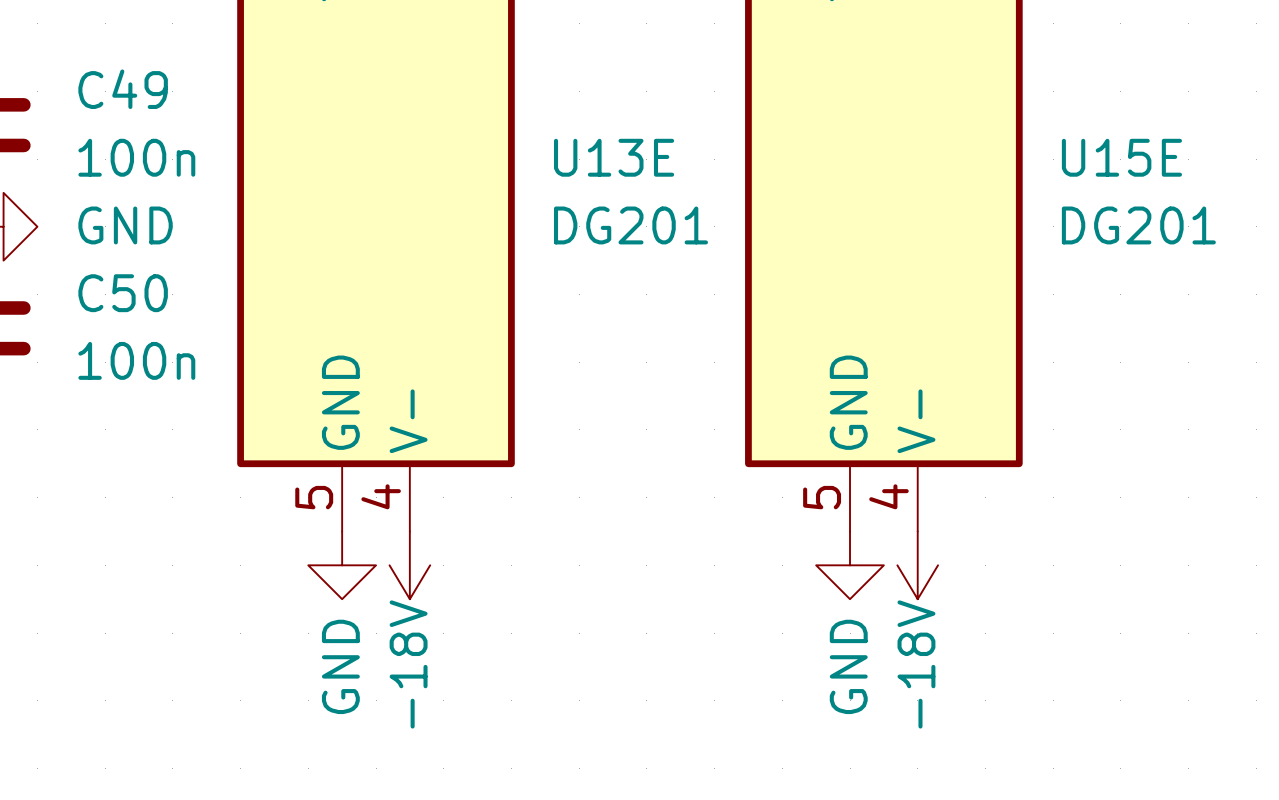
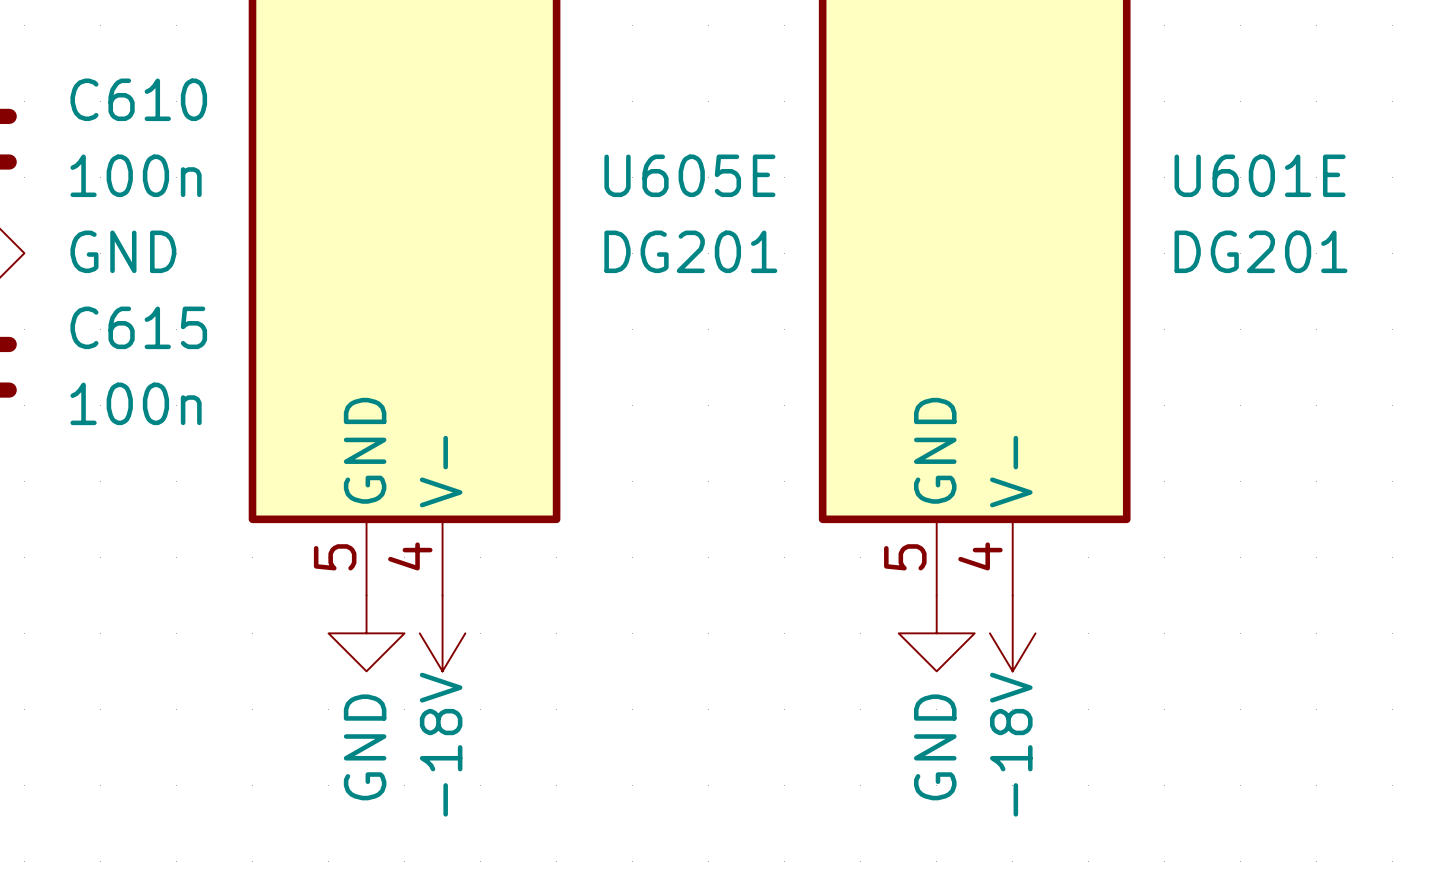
C49 name: C49 (123, 89) -> C610 (138, 99)
U13E name: U13E (614, 157) -> U605E (689, 175)
U15E name: U15E (1121, 157) -> U601E (1260, 175)
C50 name: C50 (123, 293) -> C615 (138, 327)

